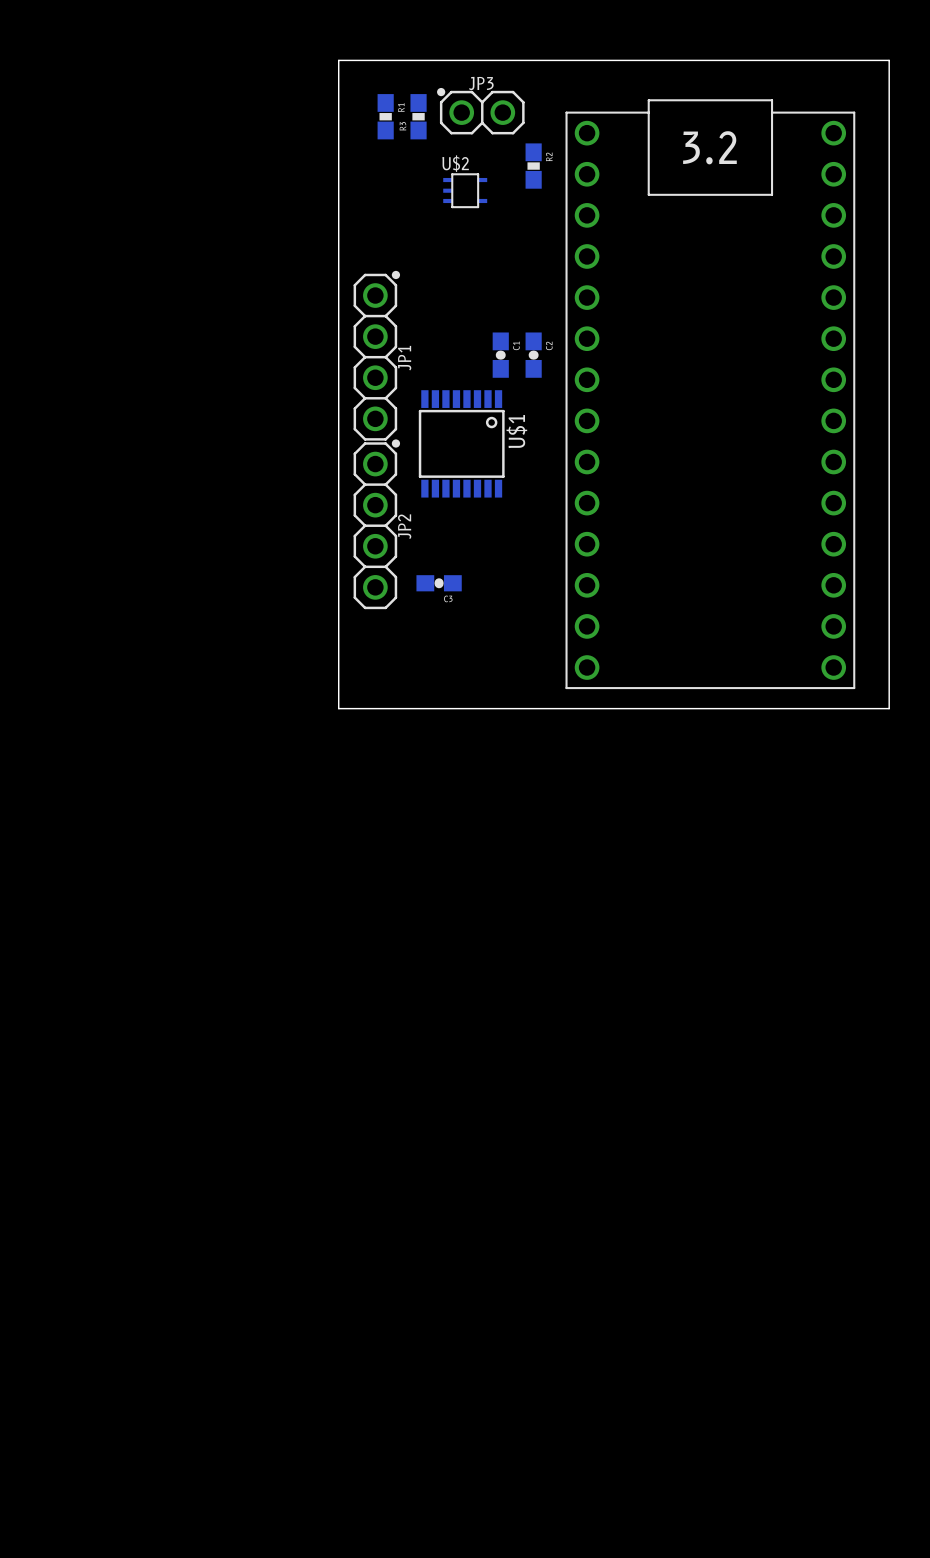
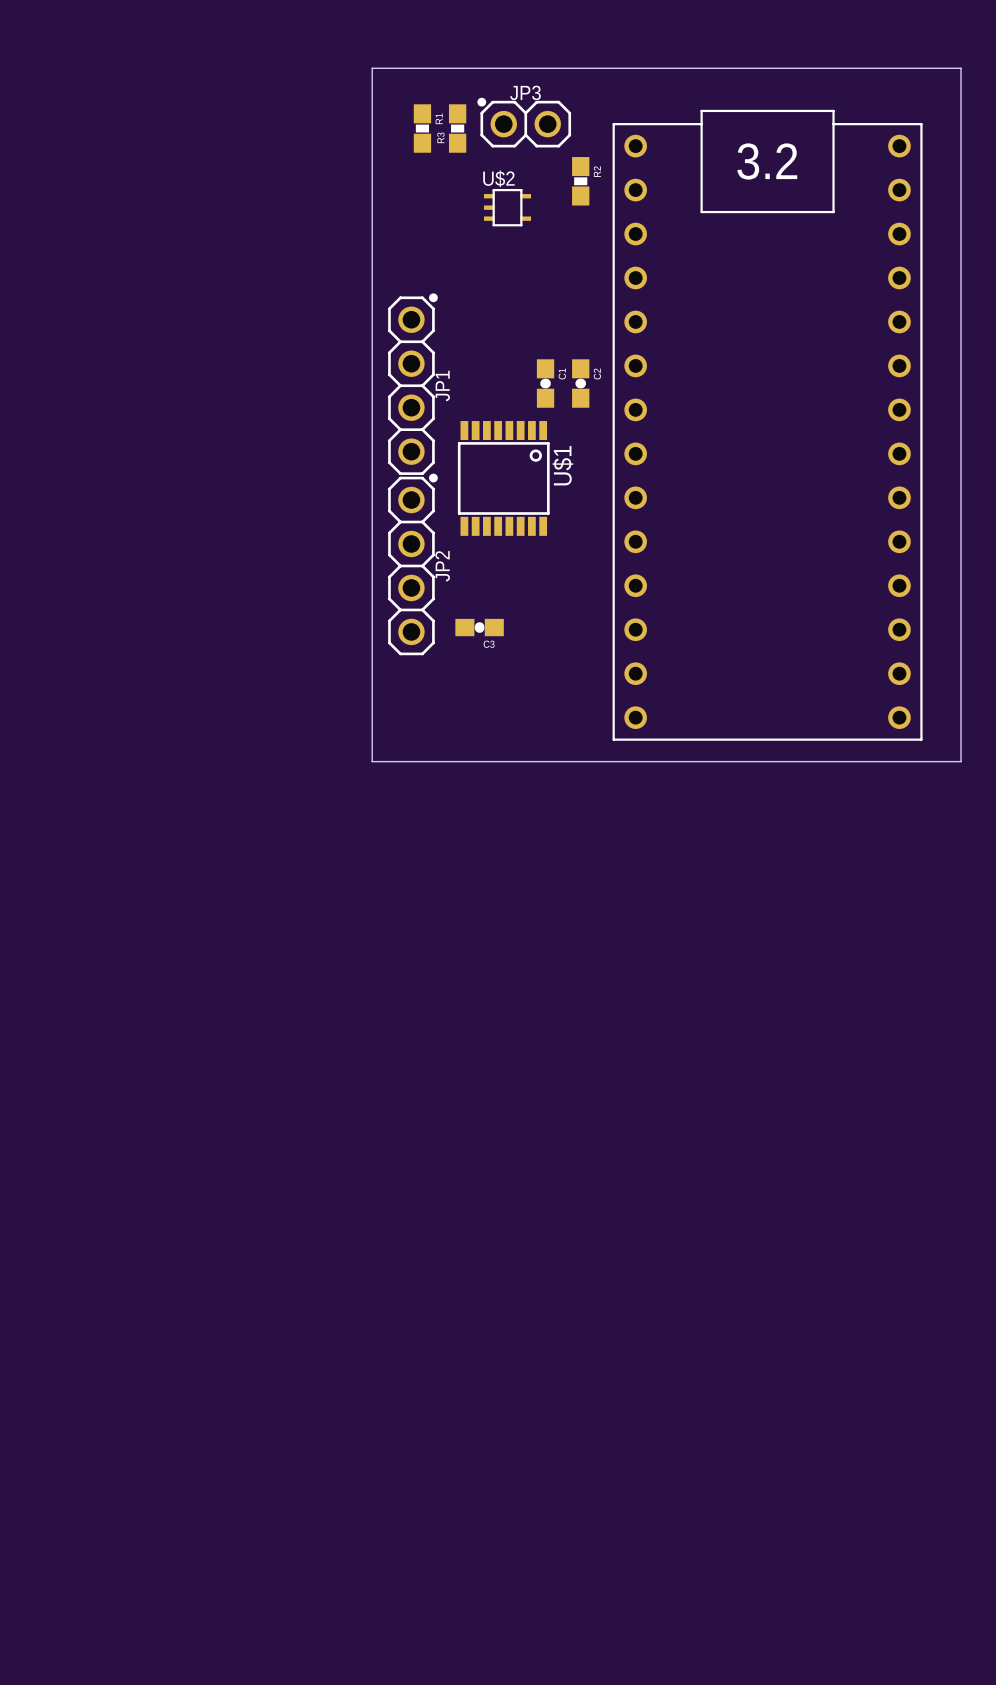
part footprint: [565, 99, 856, 690] -> [612, 109, 923, 741]

